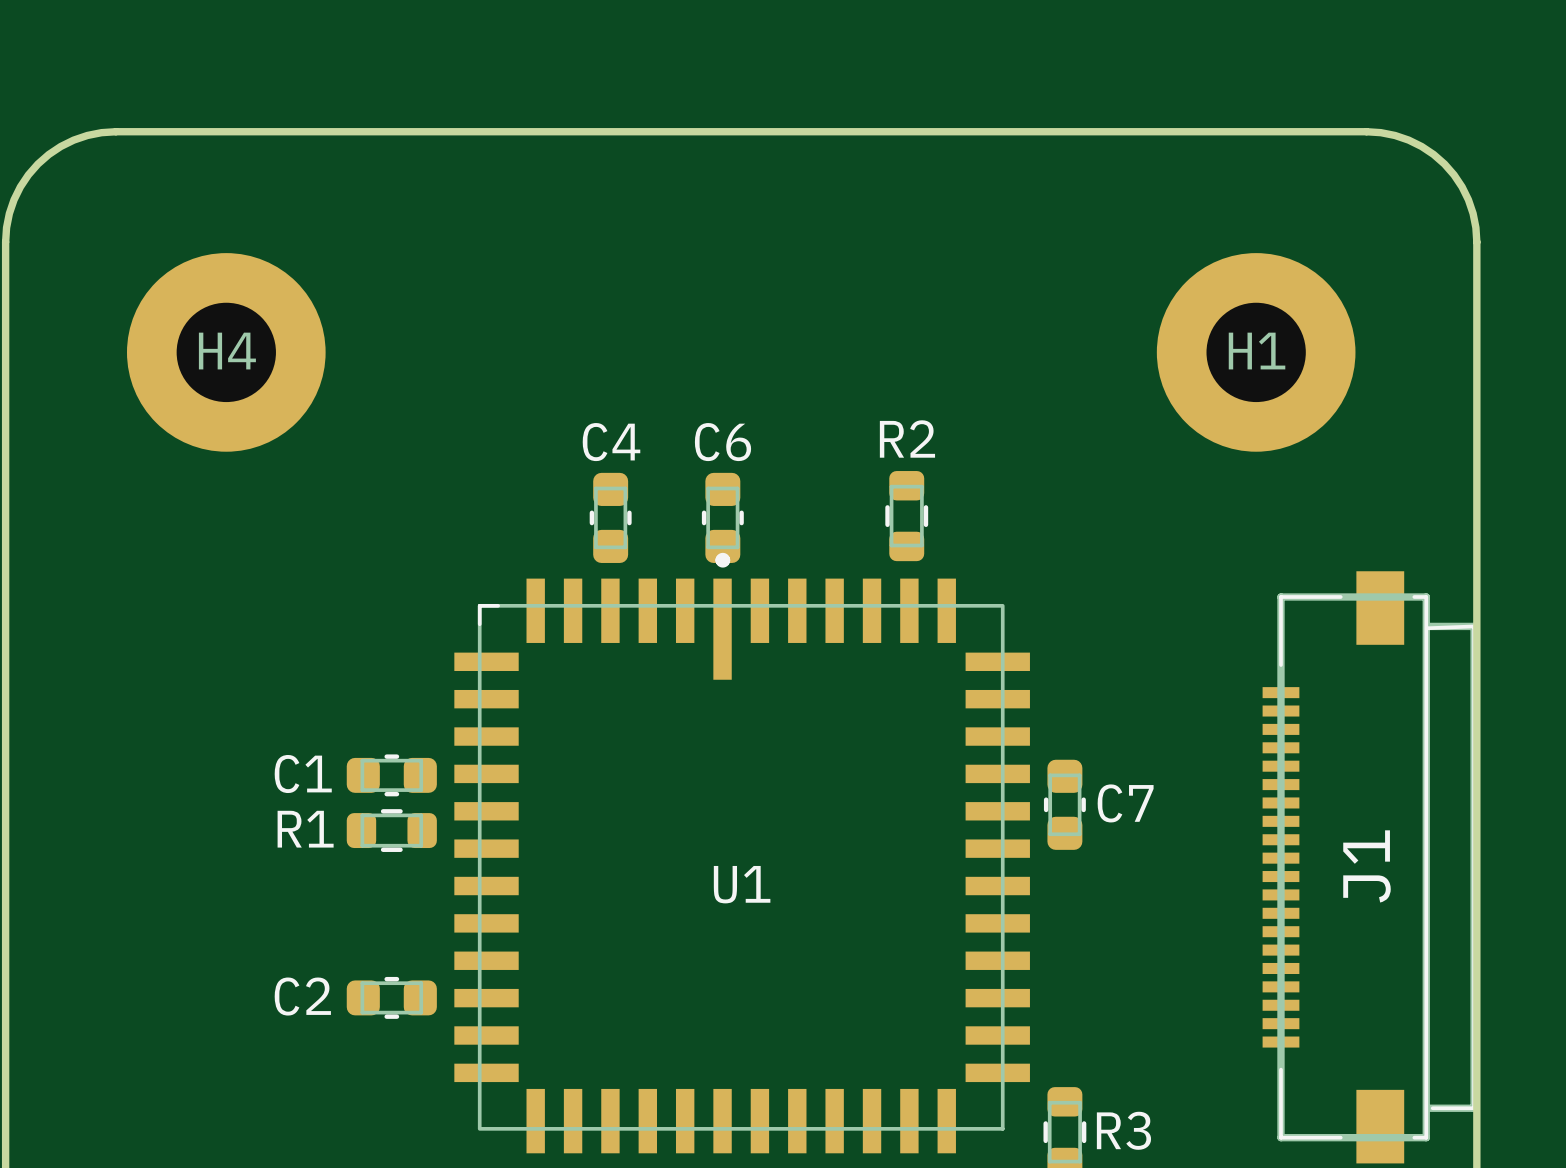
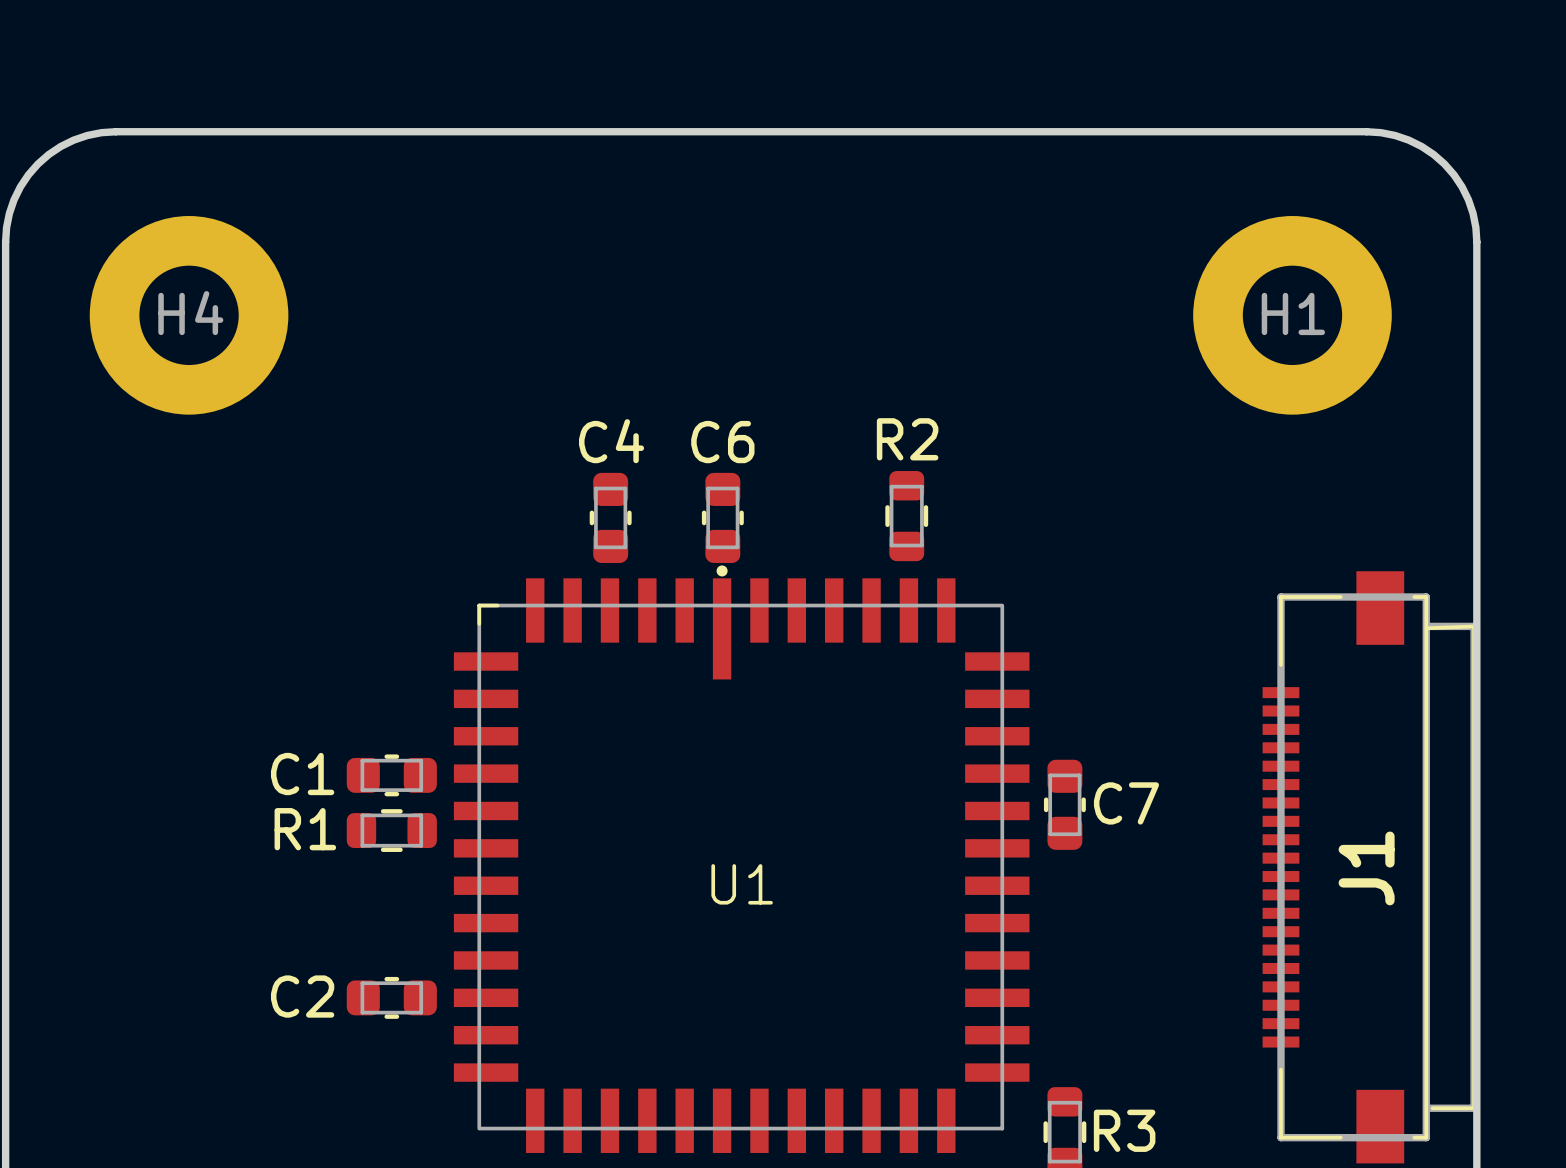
H4 position: (226, 352) -> (189, 315)
H1 position: (1256, 352) -> (1292, 315)
U1 footprint: [454, 552, 1030, 1154] -> [453, 565, 1030, 1154]

